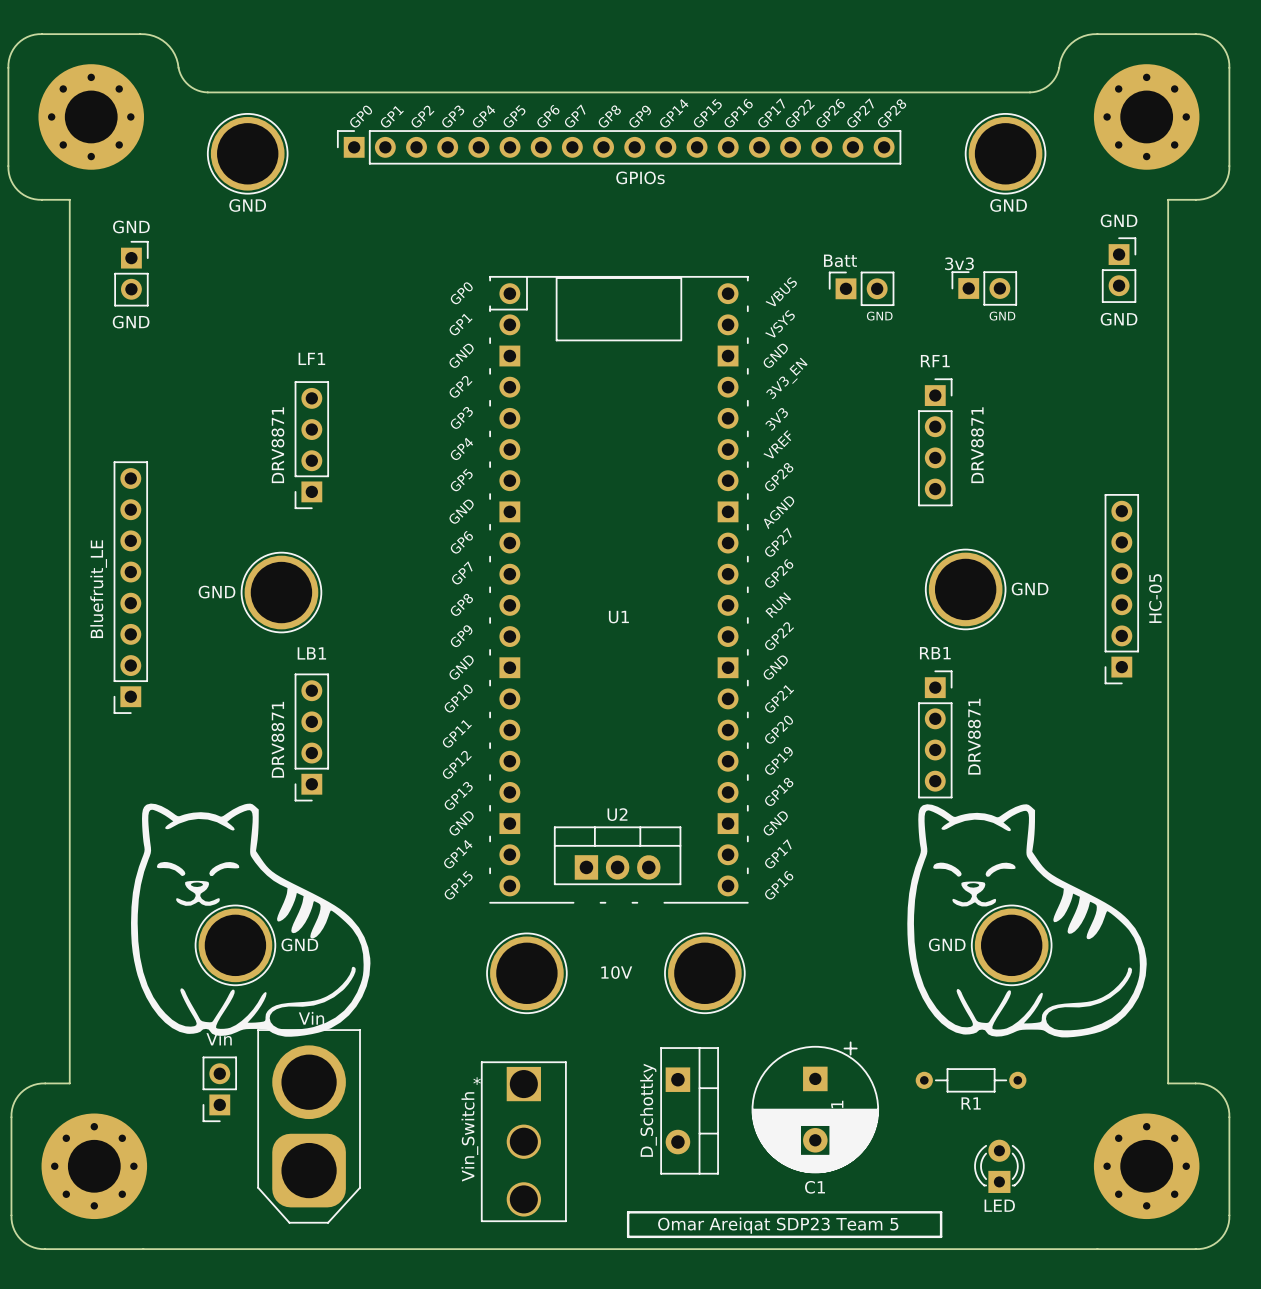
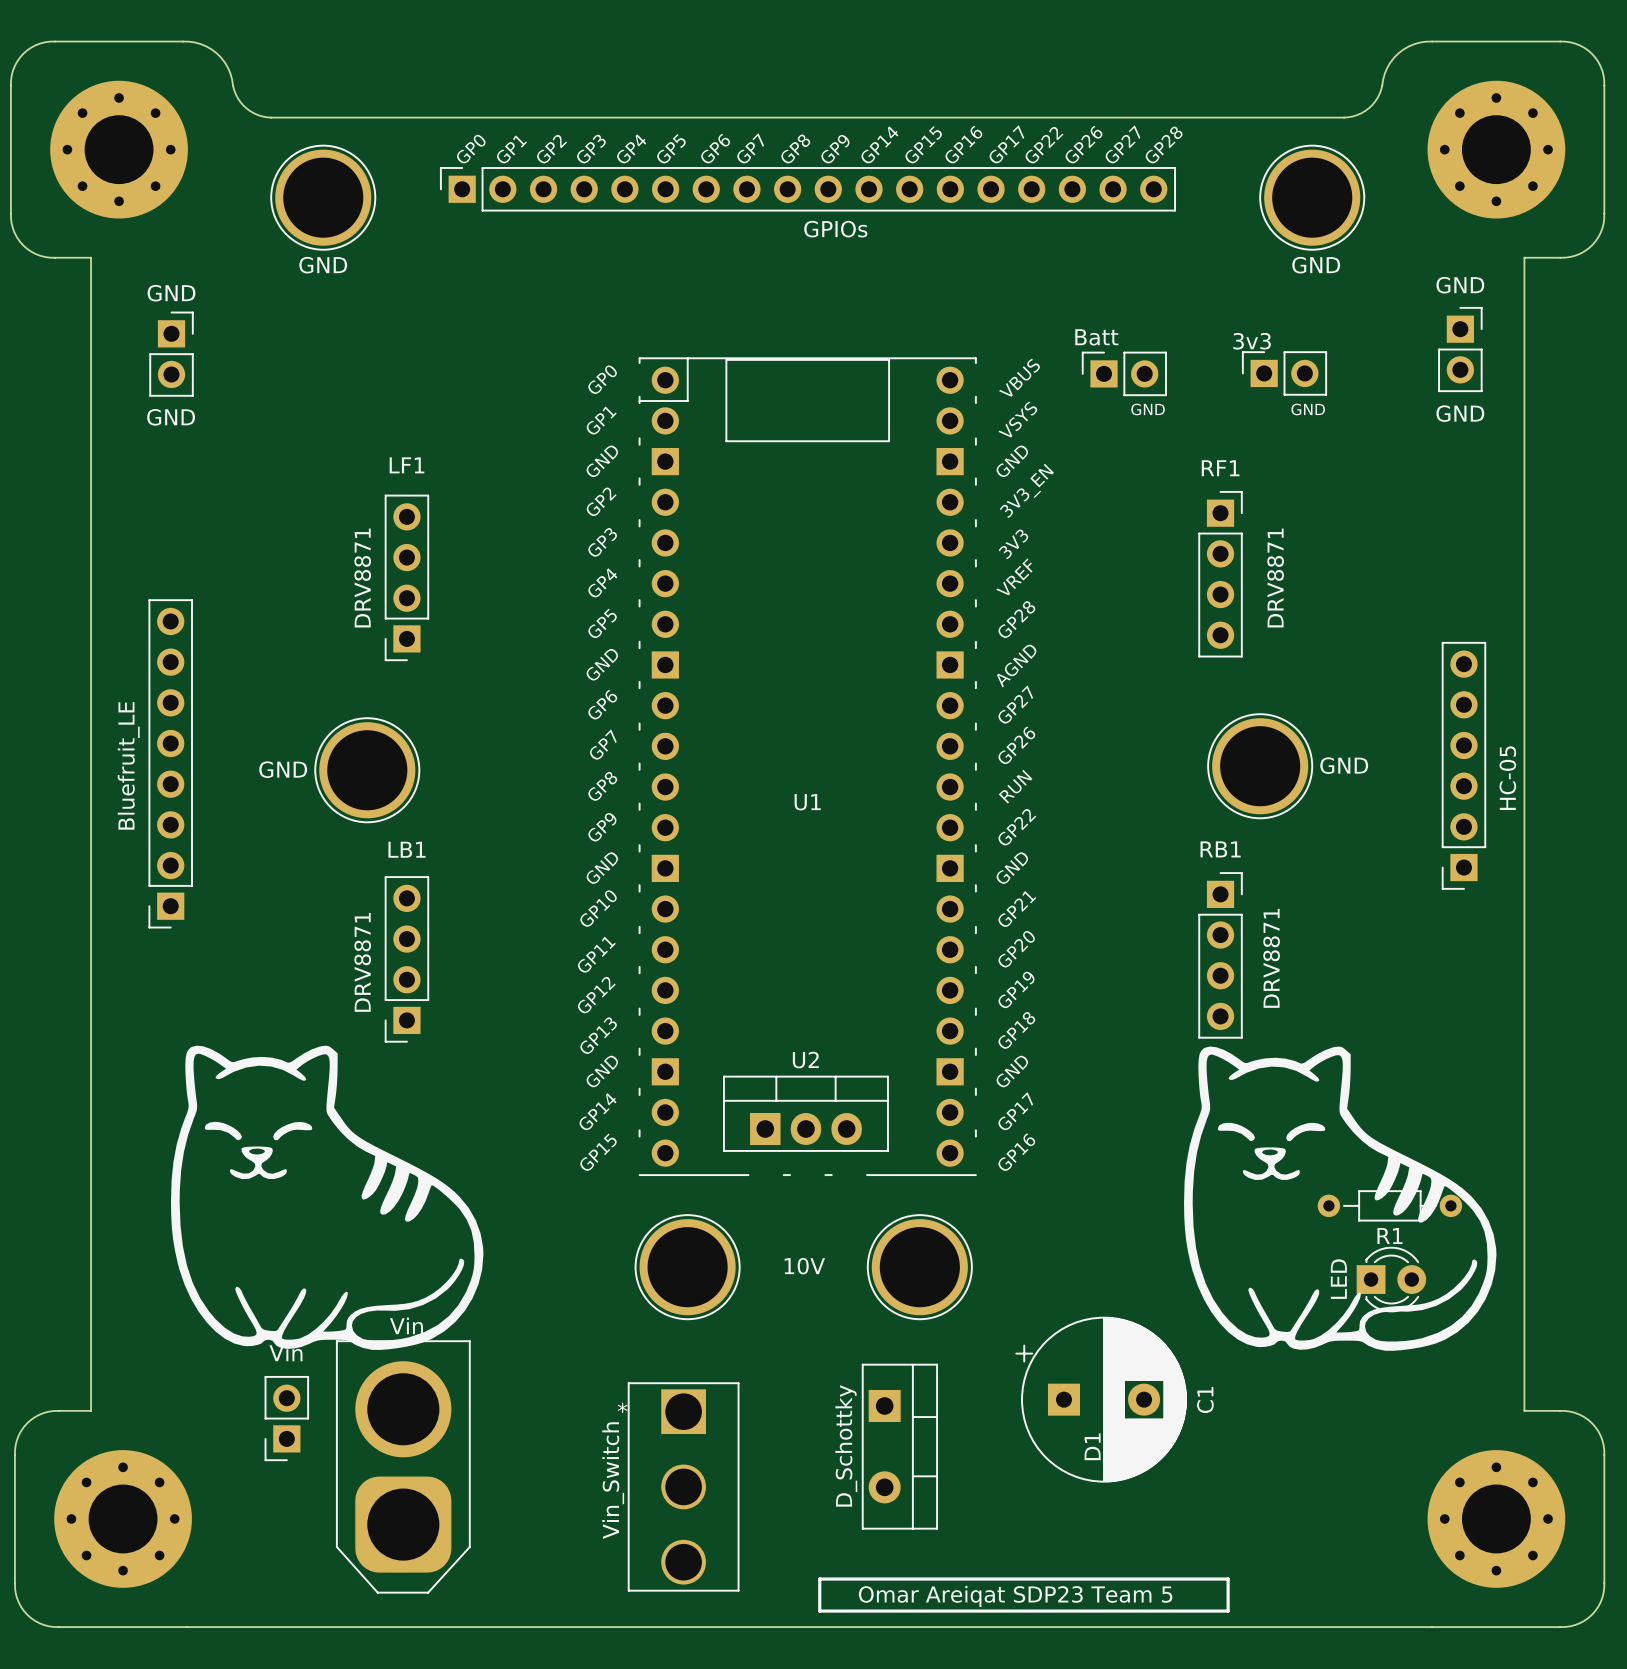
part: GND (235, 945) -> none
part: GND (1011, 945) -> none
R1 position: (971, 1080) -> (1389, 1205)
C1 rotation: 0° (815, 1107) -> 90° counterclockwise (1101, 1399)
part rotation: 0° (999, 1166) -> 90° clockwise (1391, 1279)
part position: (999, 1166) -> (1391, 1279)

